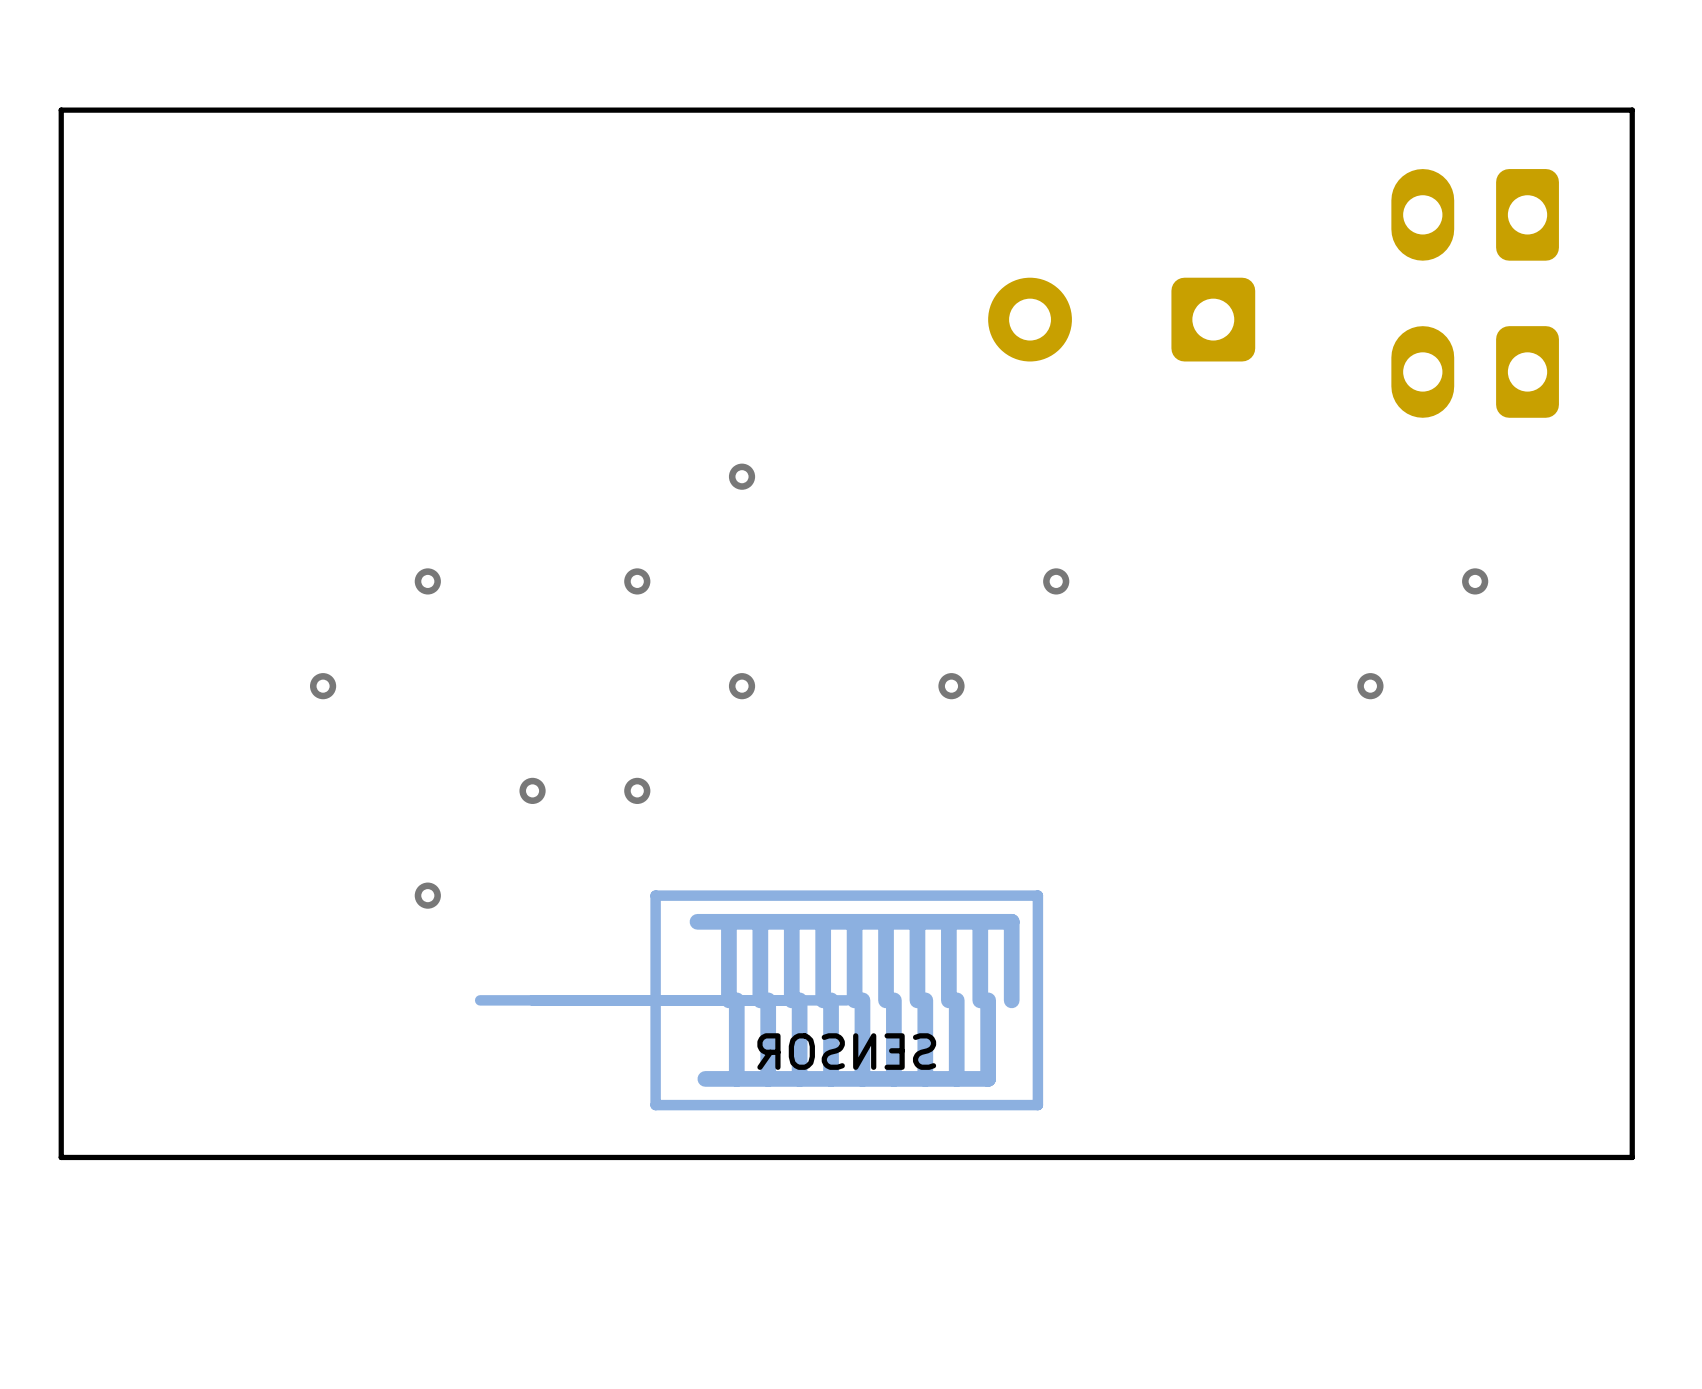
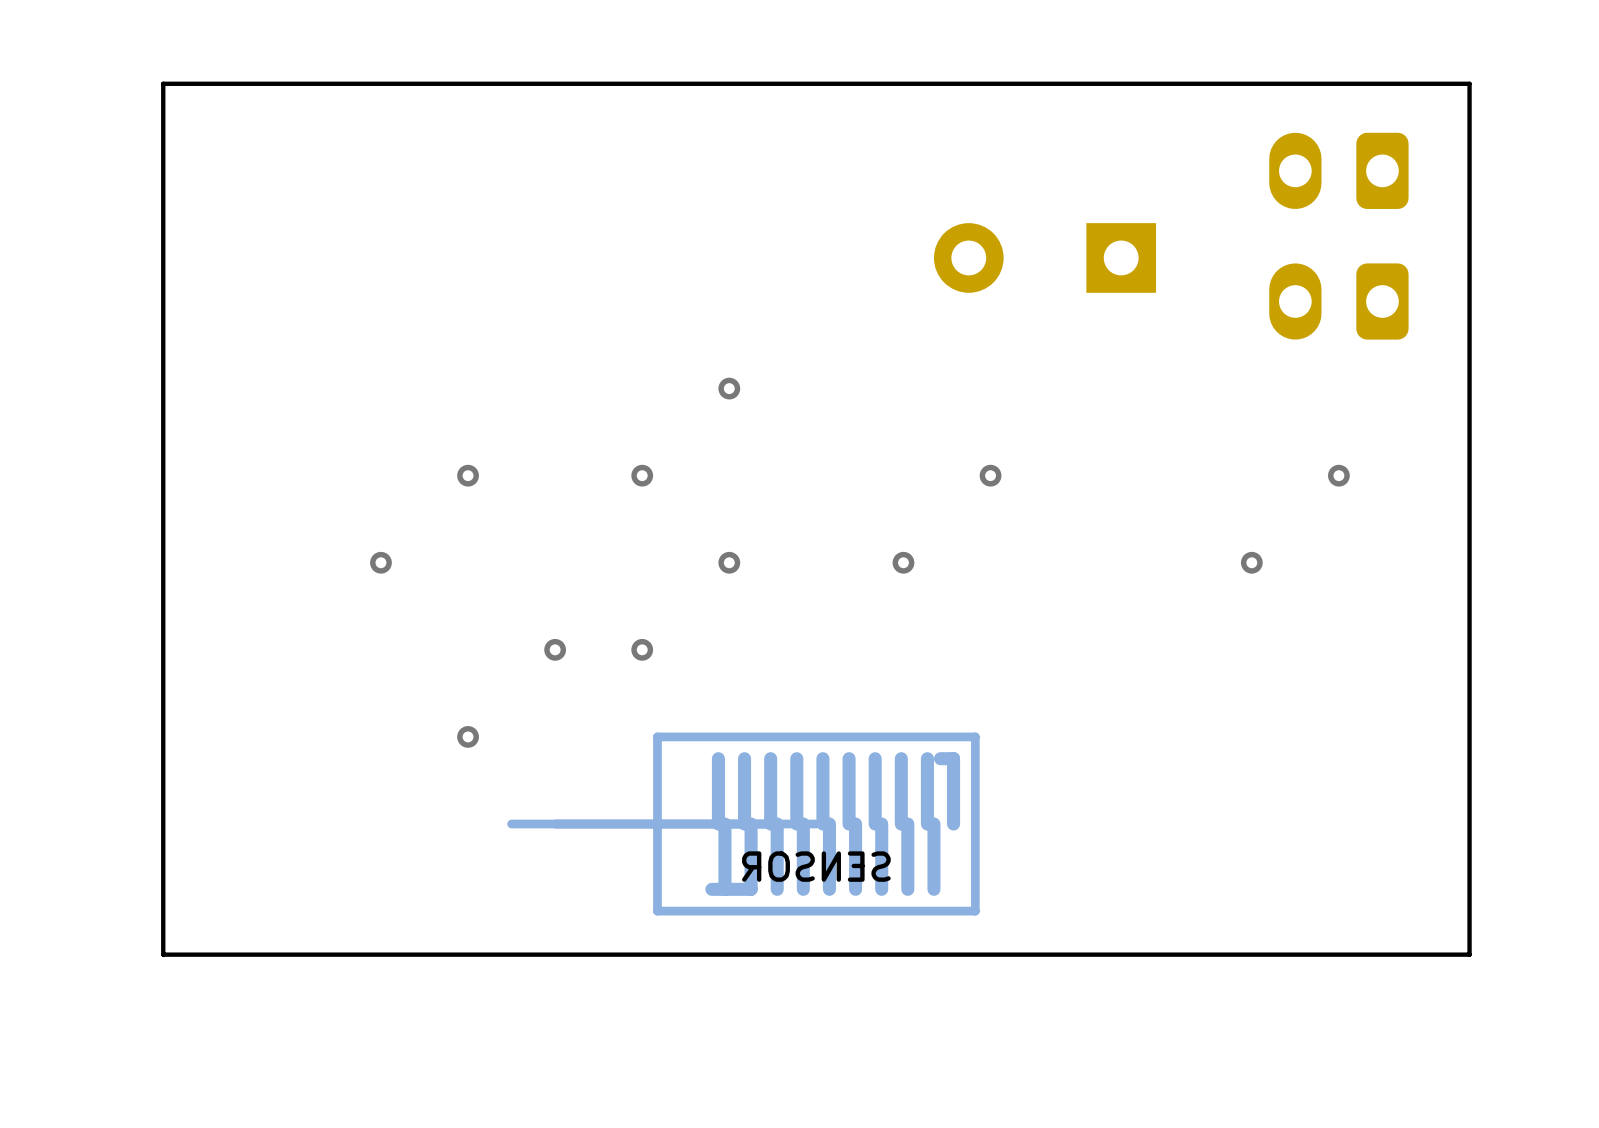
part footprint: [988, 277, 1256, 362] -> [933, 223, 1157, 293]
track: (995, 921) (697, 921) -> none
track: (721, 1078) (705, 1078) -> none
track: (988, 1078) (768, 1078) -> none

